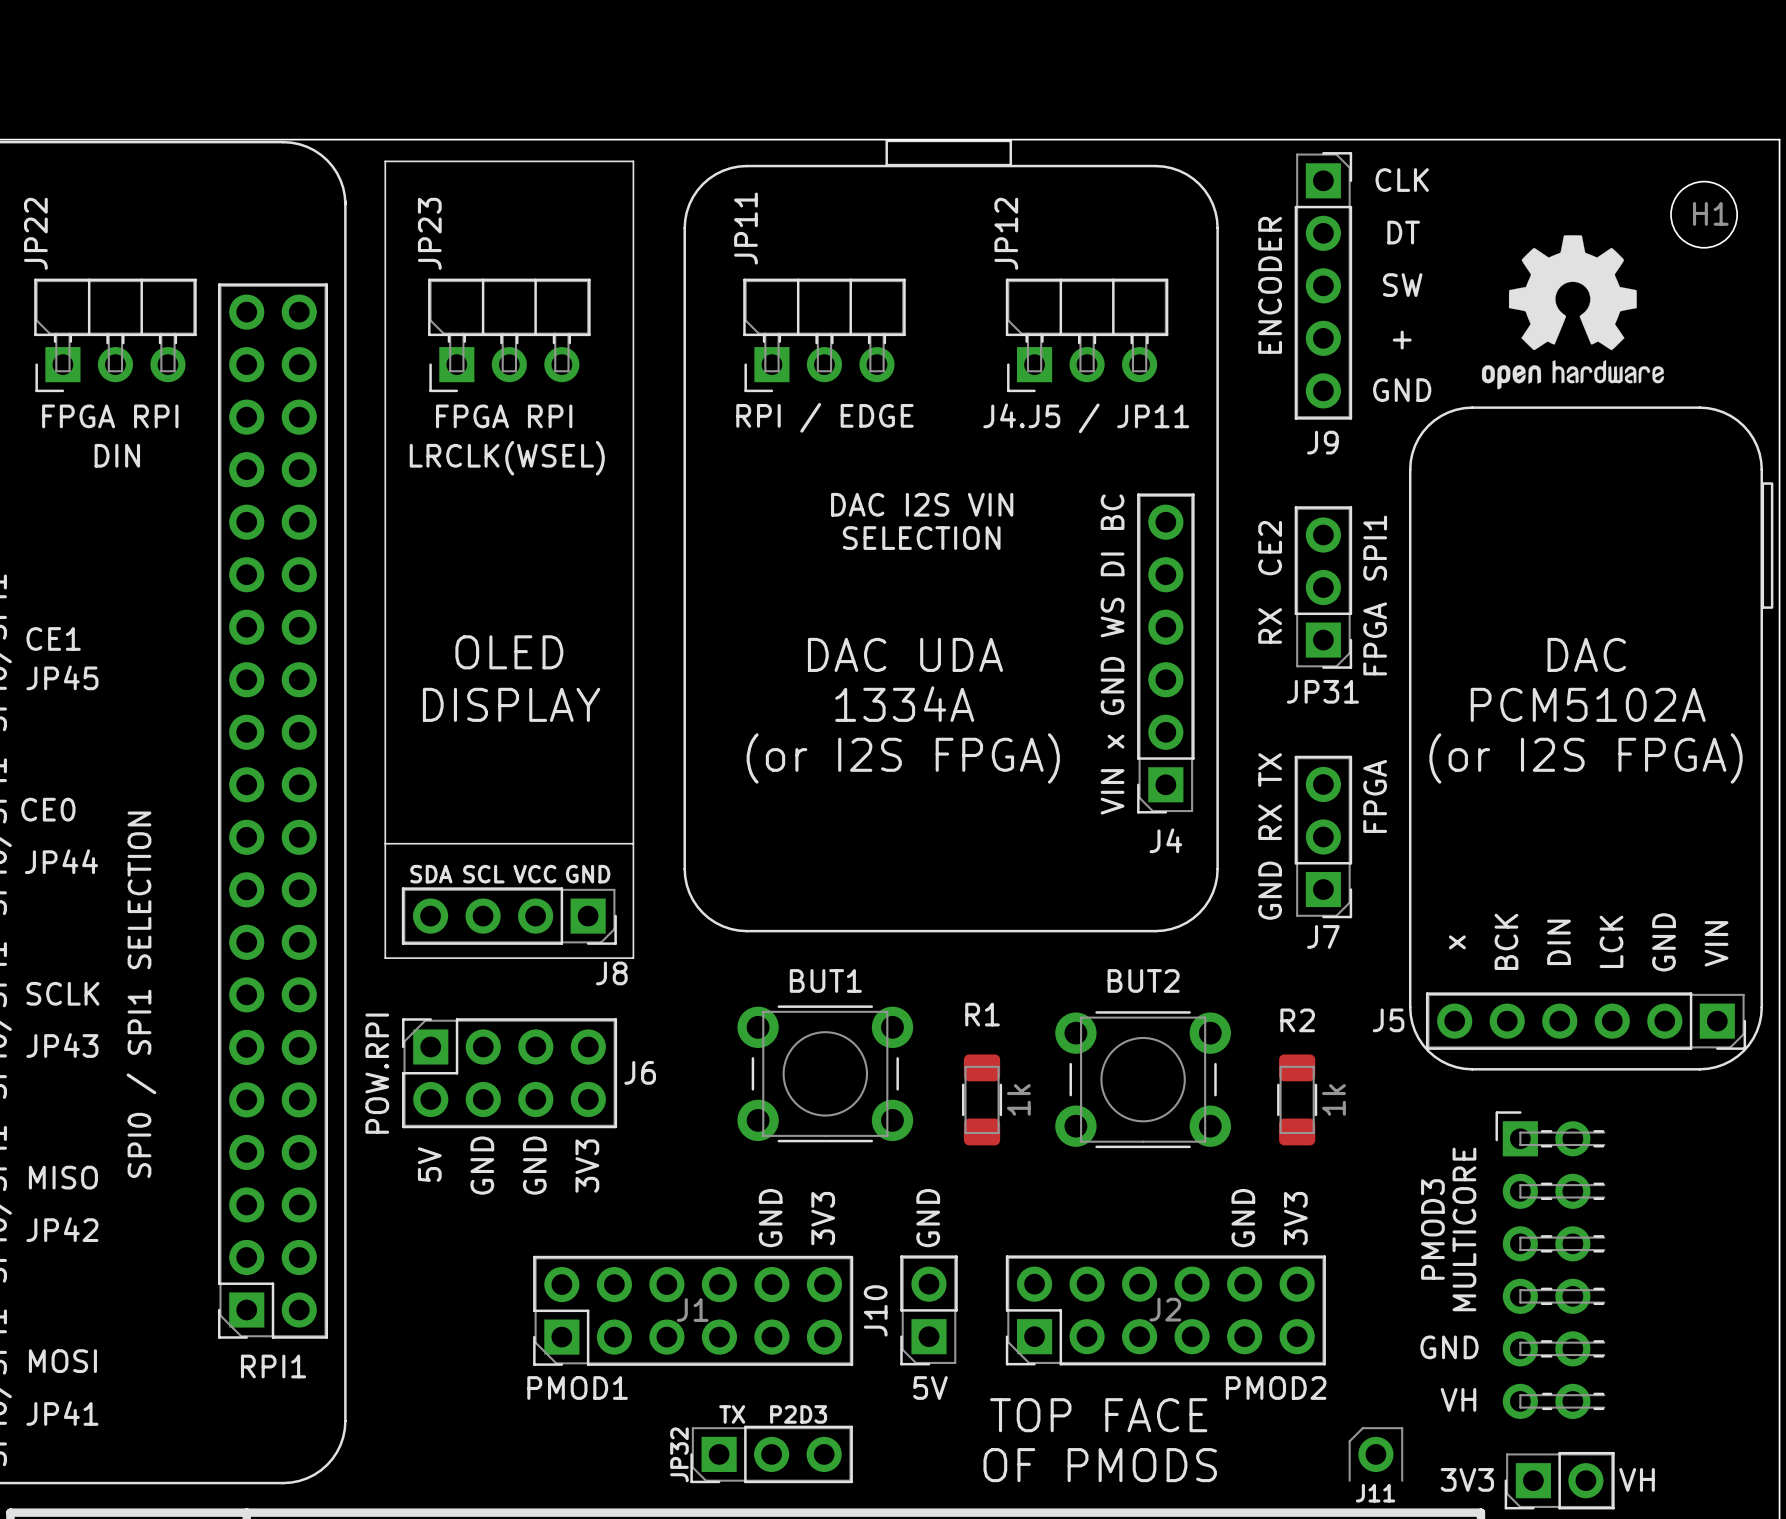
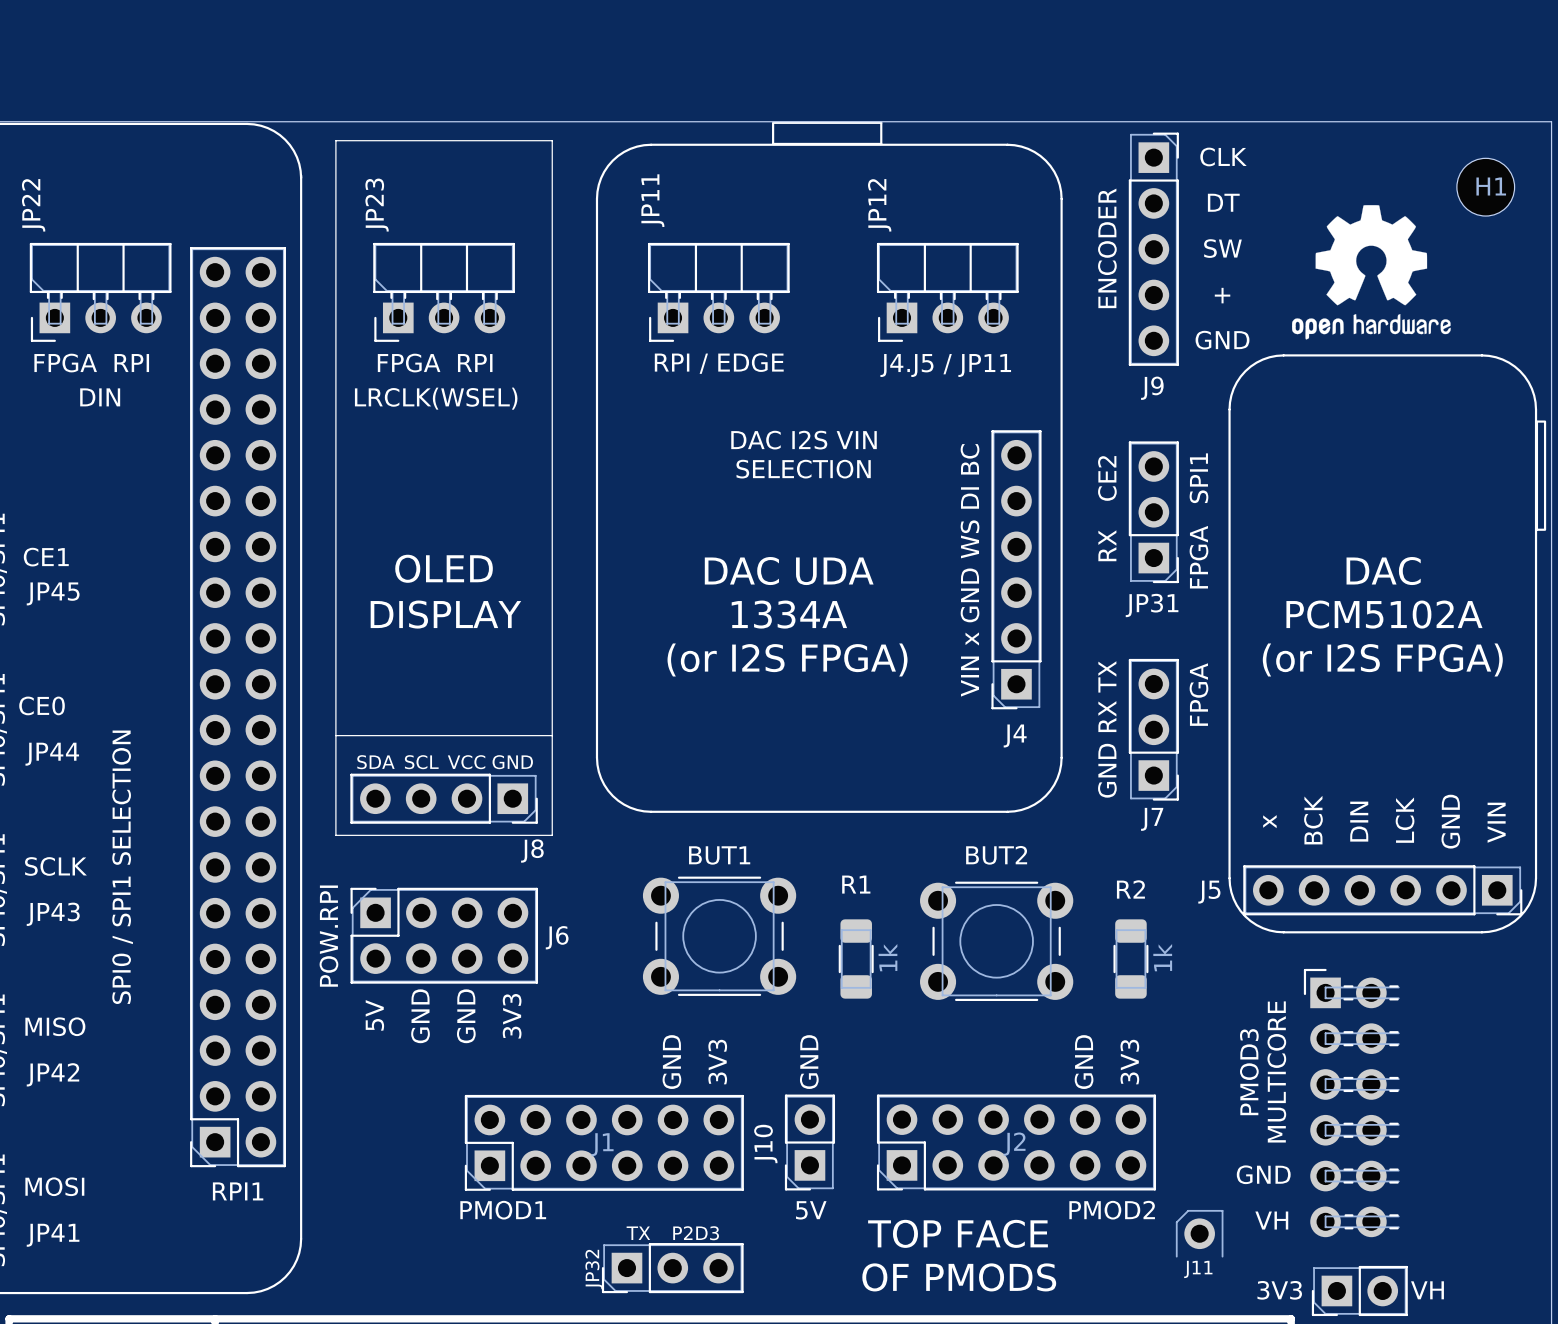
J11 position: (1375, 1454) -> (1199, 1233)

